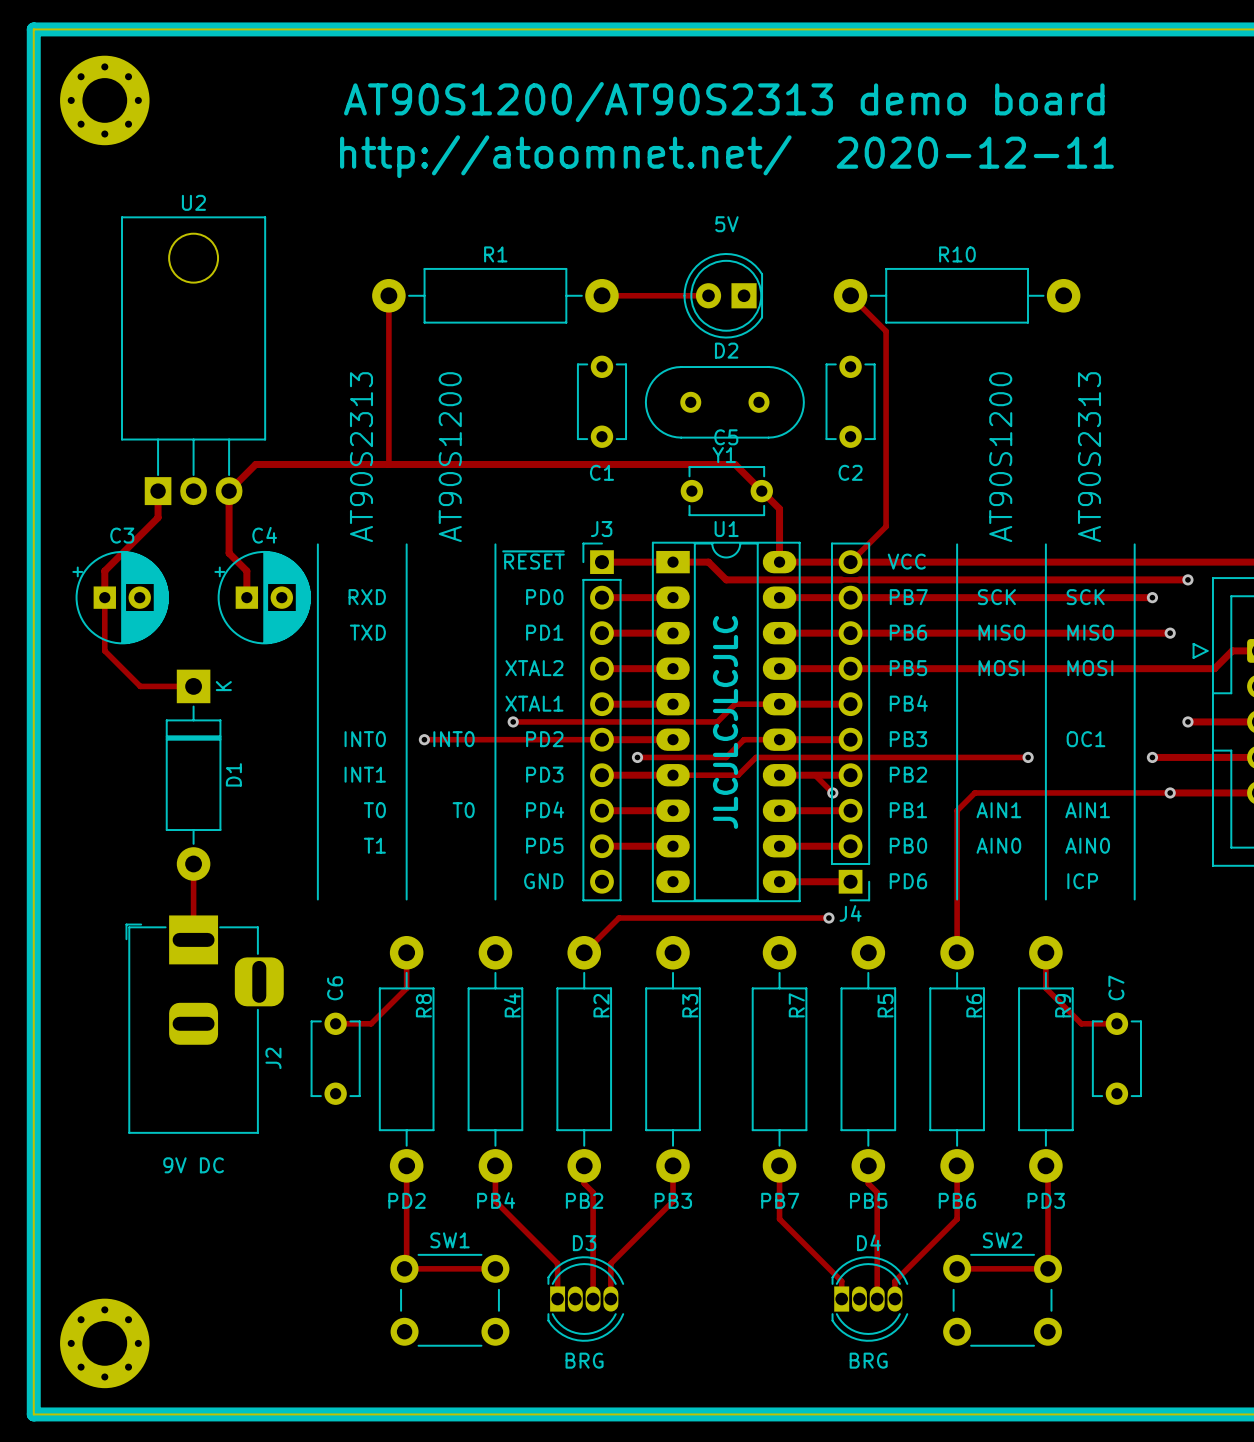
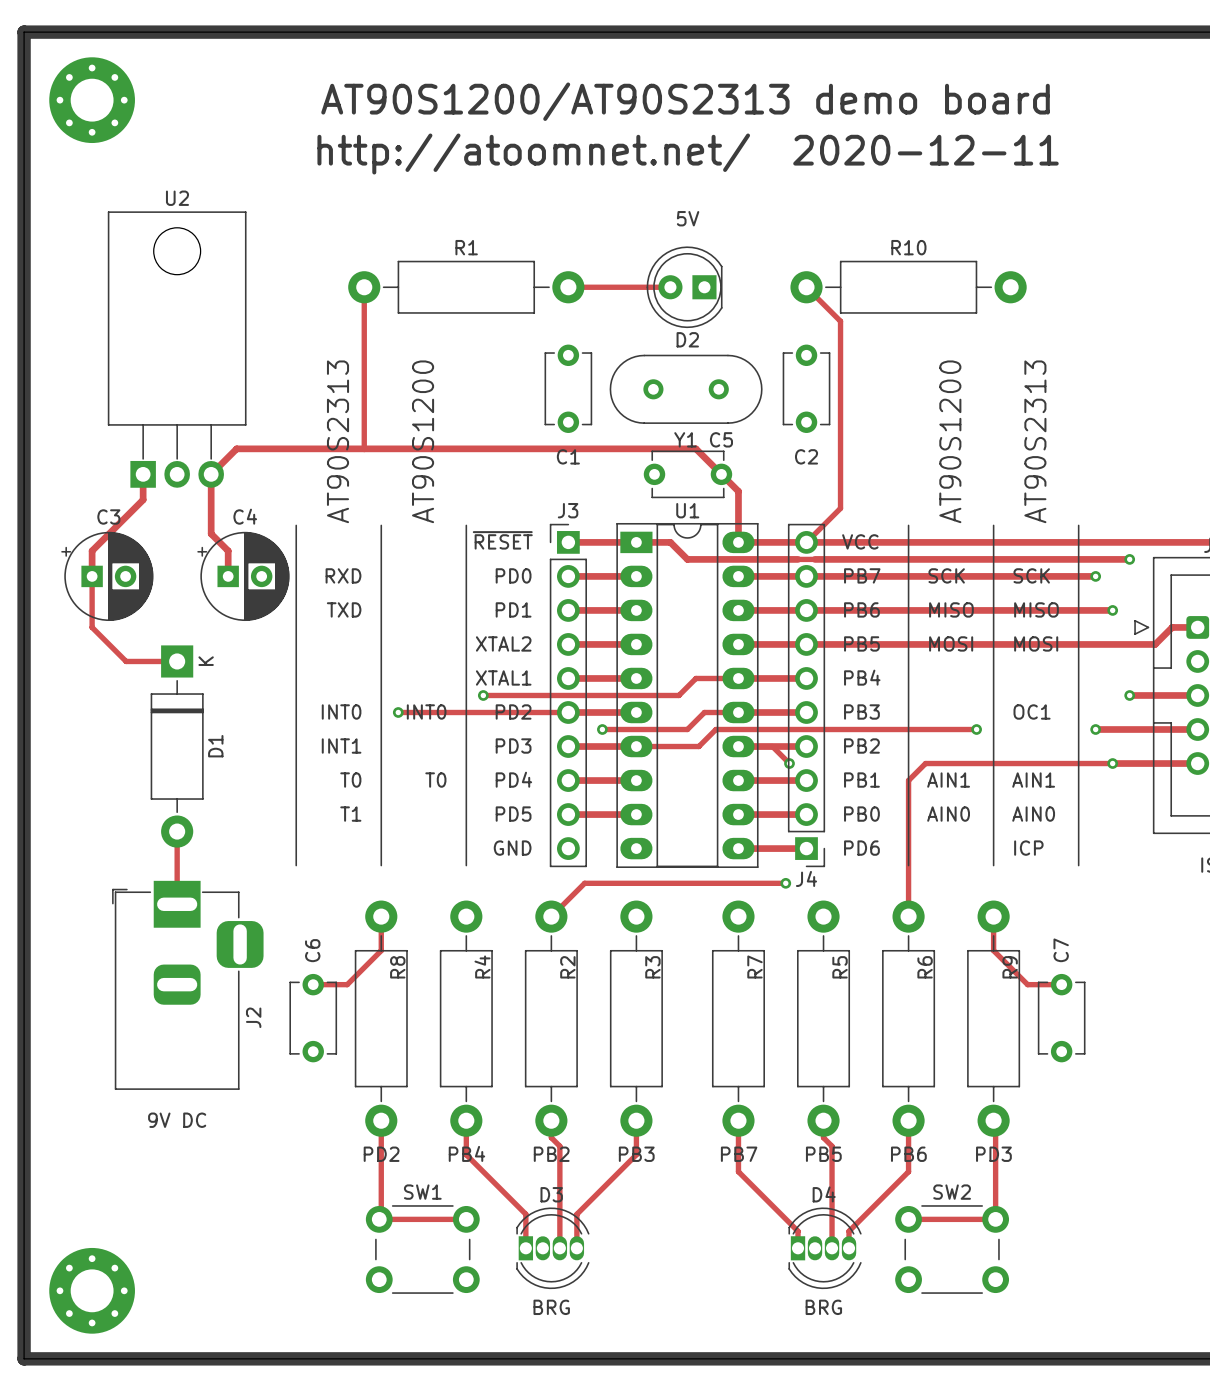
C5 name position: C5 (726, 437) -> C5 (721, 439)
text: JLCJLCJLCJLC (725, 722) -> none

